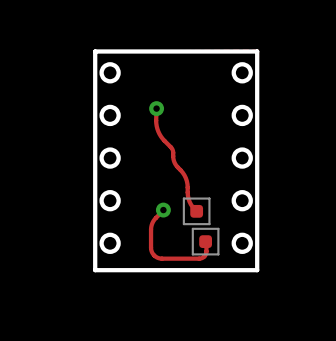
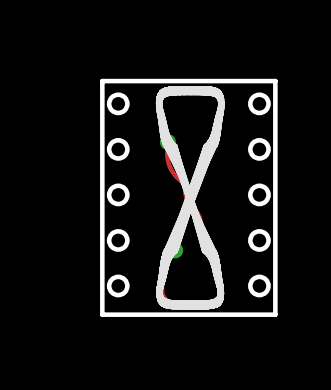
drawing: none -> [155, 86, 225, 310]
part: (196, 211) -> none
part: (205, 241) -> none

